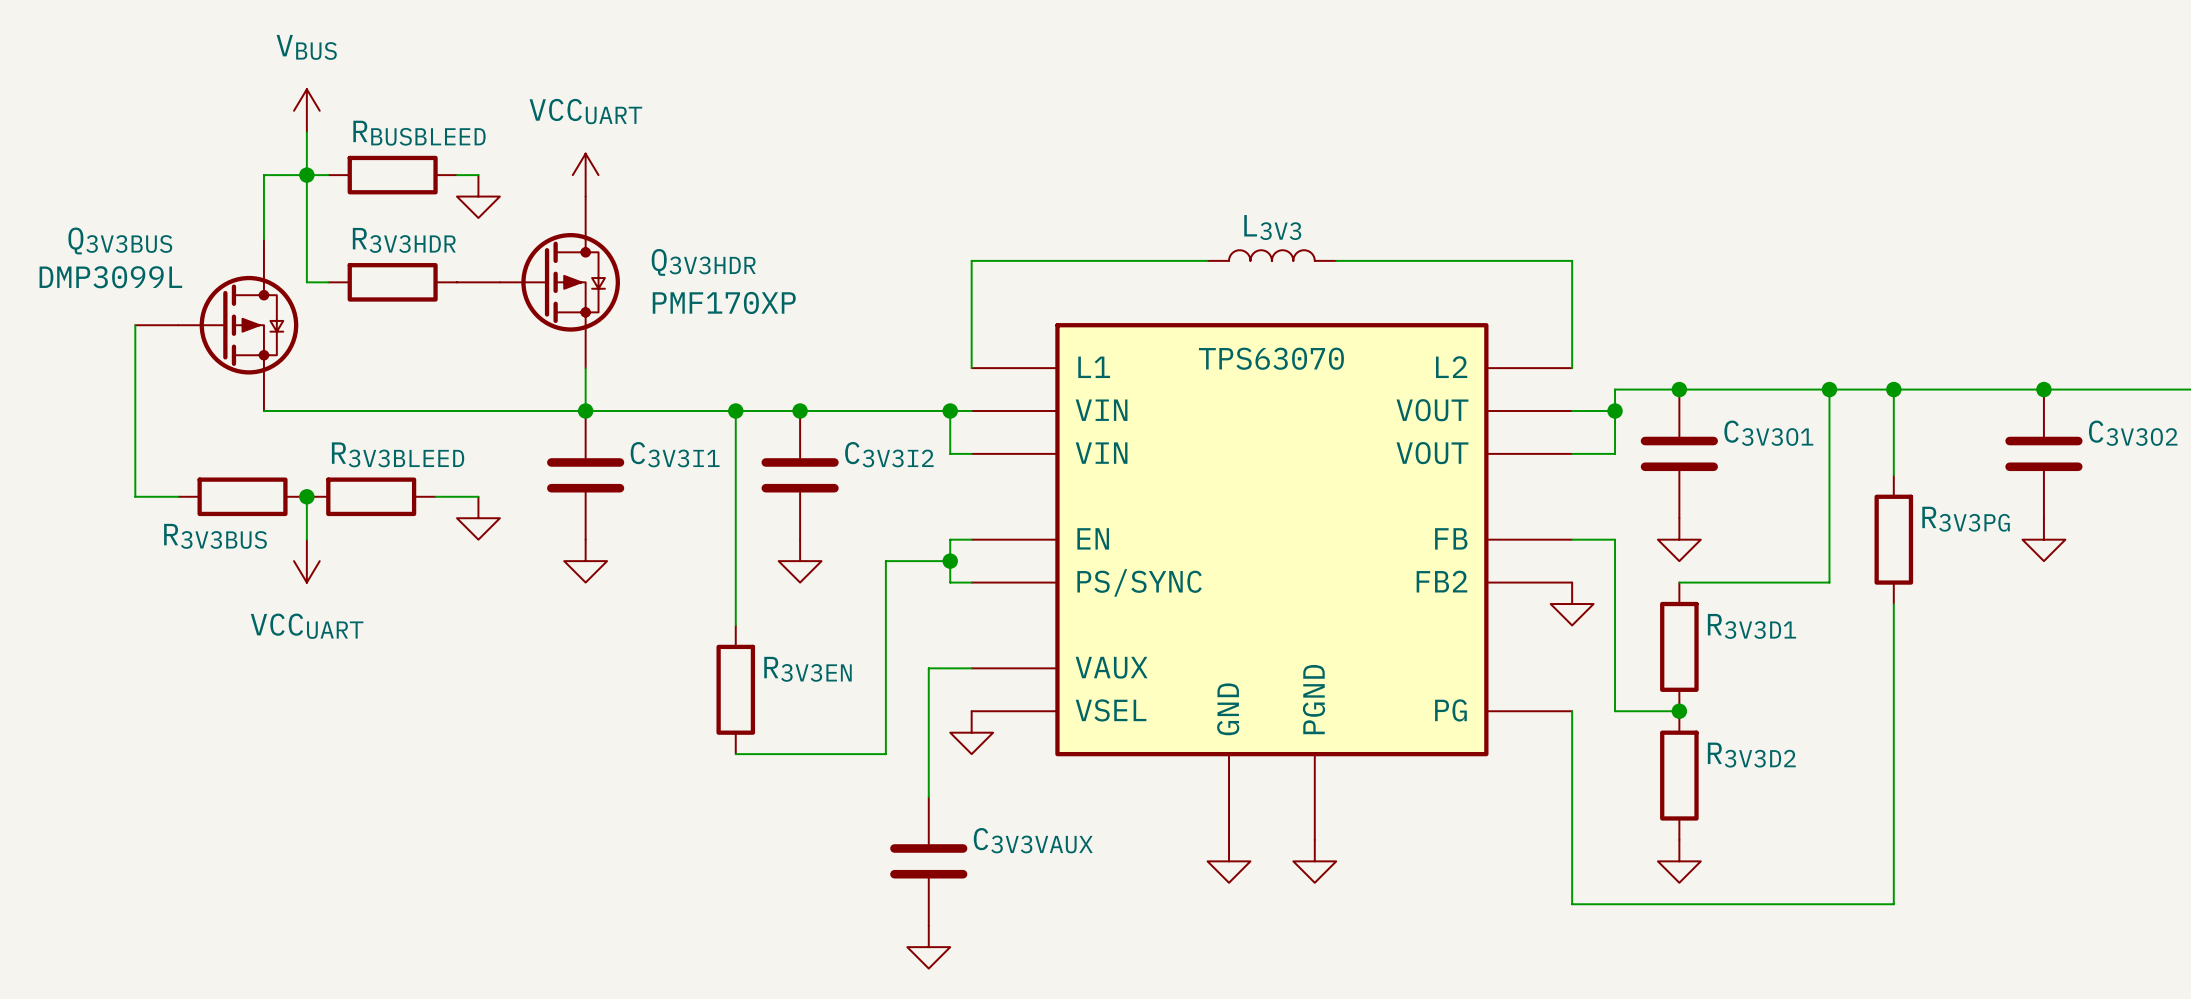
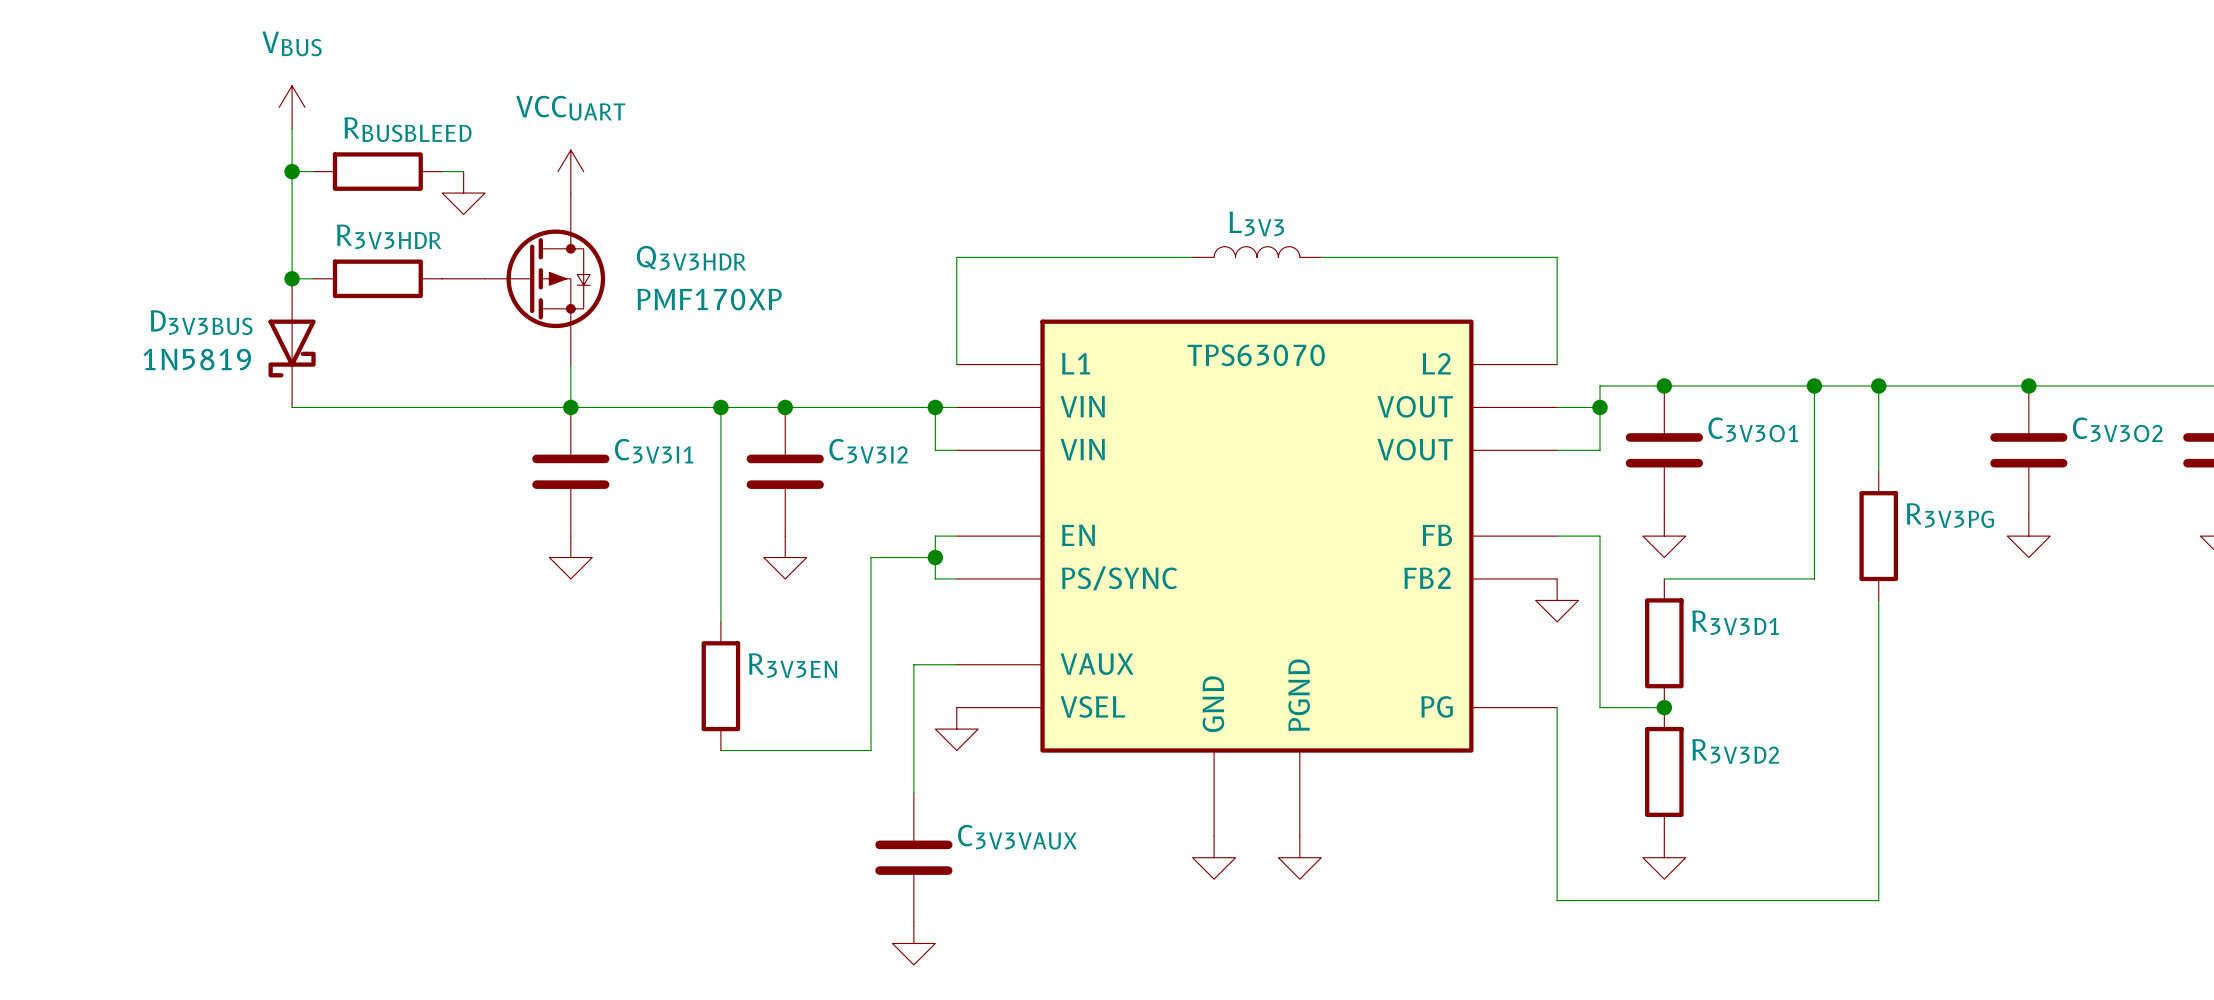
wire: (306, 175) (263, 175) (263, 239) -> none
junction: none -> (292, 278)
wire: (135, 325) (135, 496) (178, 496) -> none
Q3V3BUS: DMP3099L (216, 325) -> none
D3V3BUS: none -> 1N5819 (292, 343)
wire: (263, 411) (306, 411) -> none
R3V3BUS: (242, 496) -> none
wire: (306, 496) (306, 539) -> none
junction: (306, 496) -> none
R3V3BLEED: (371, 496) -> none
wire: (435, 496) (478, 496) -> none
power symbol: (478, 518) -> none
power symbol: VCCUART (306, 561) -> none

